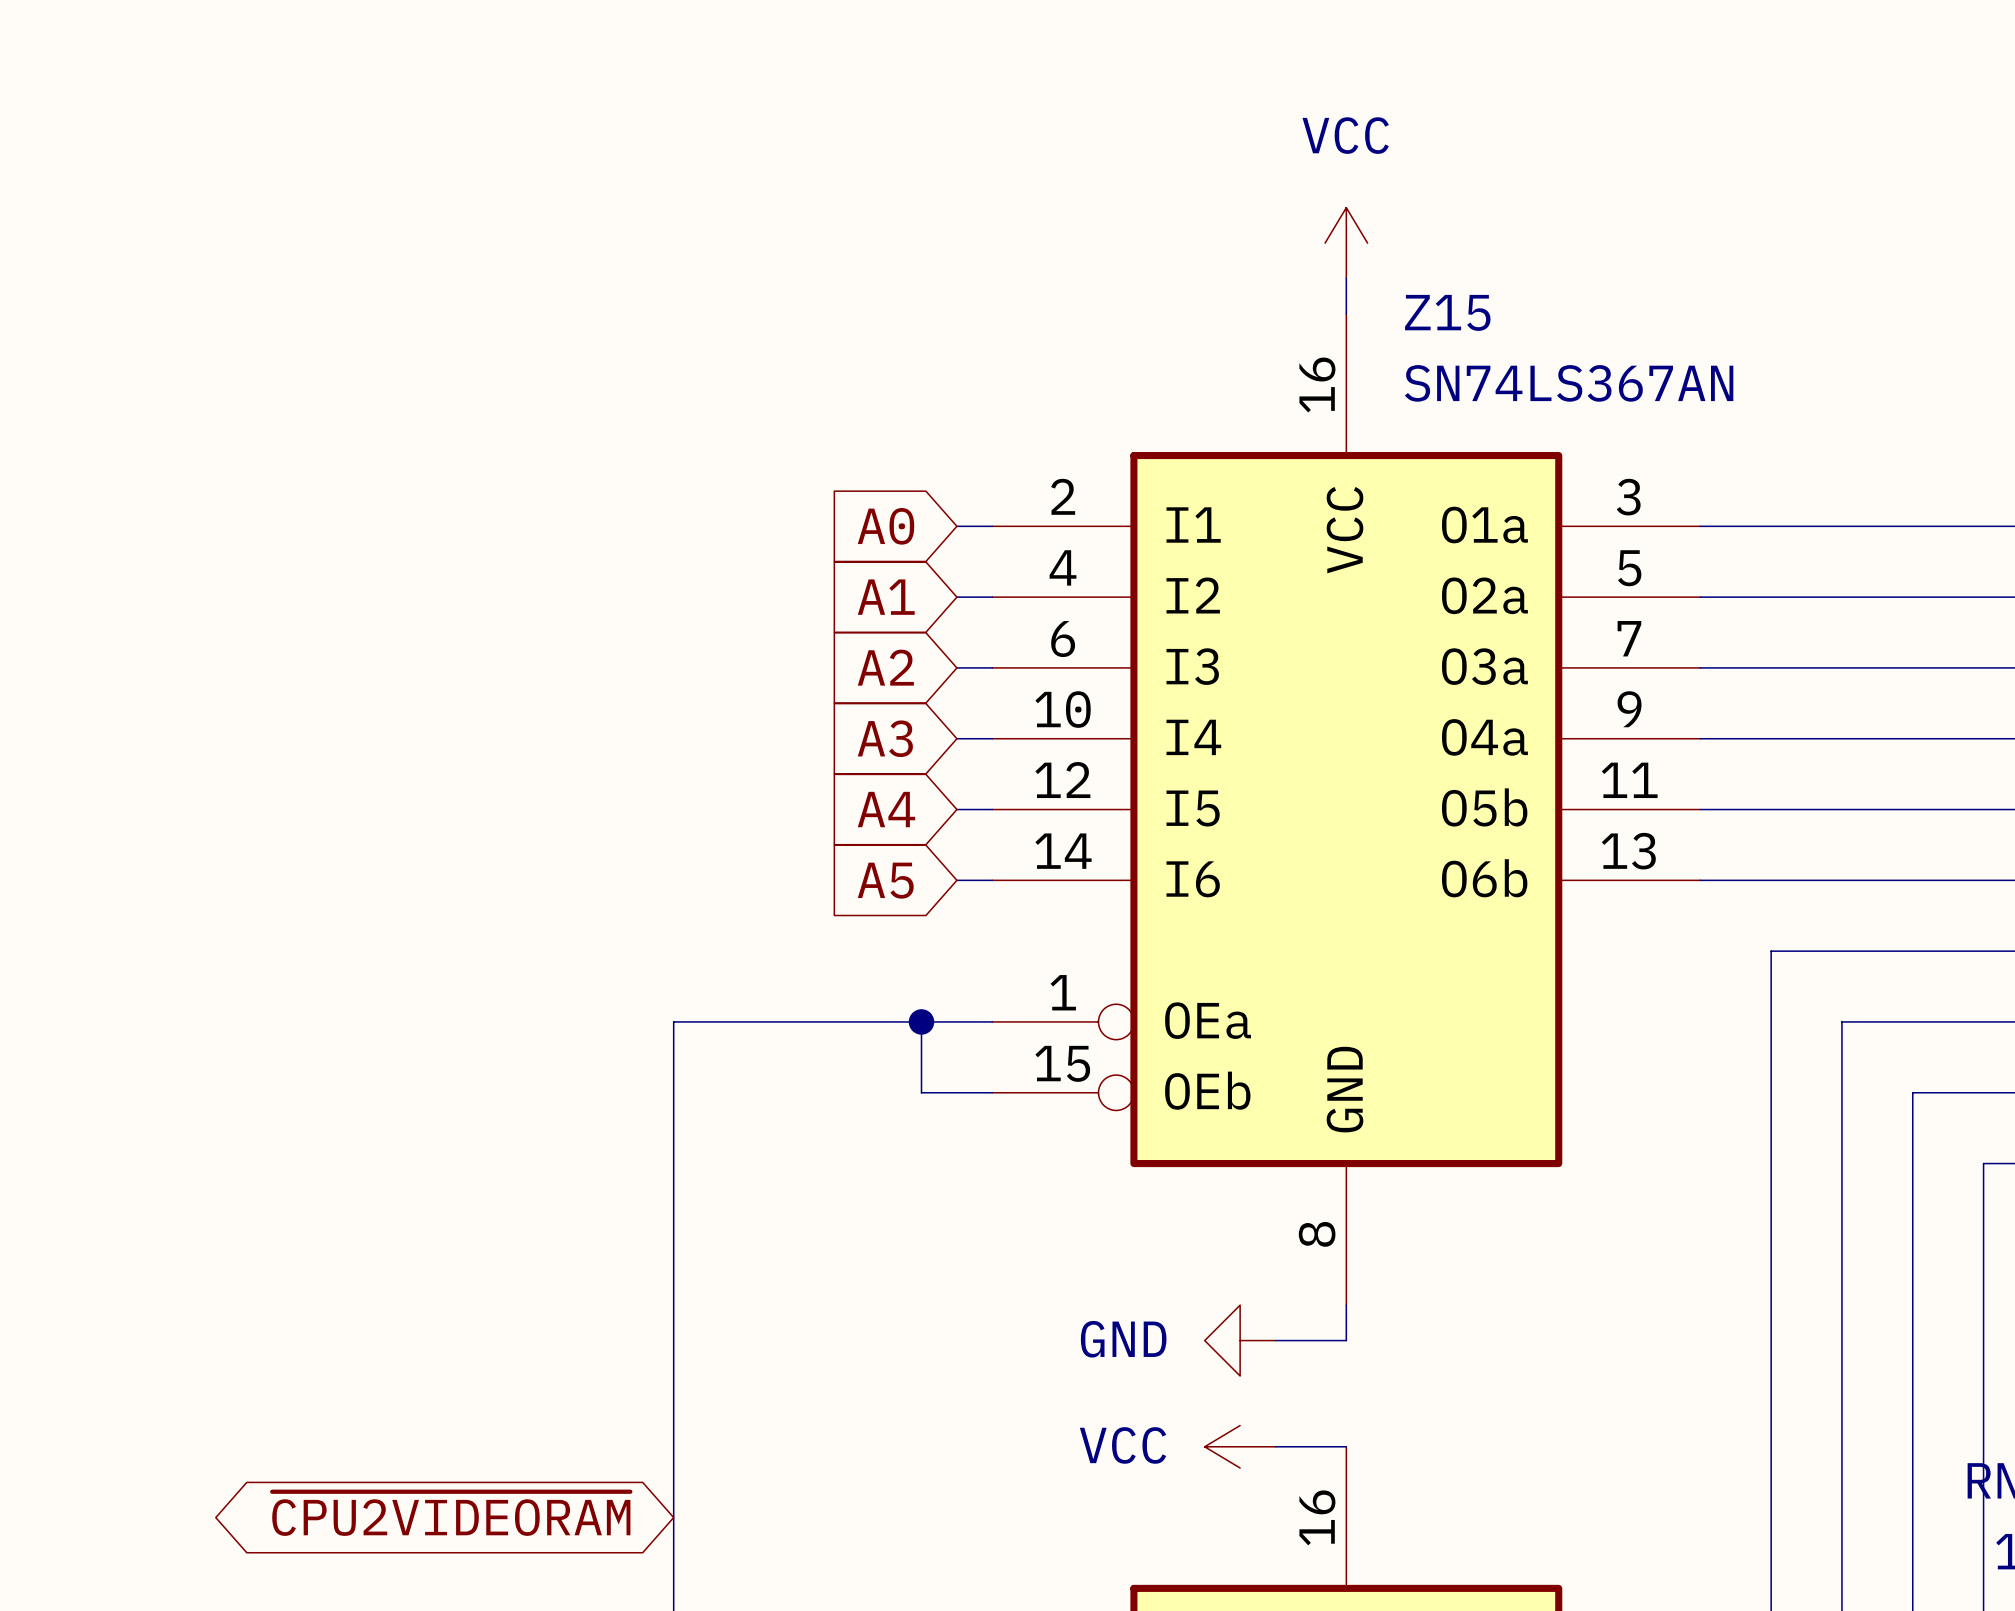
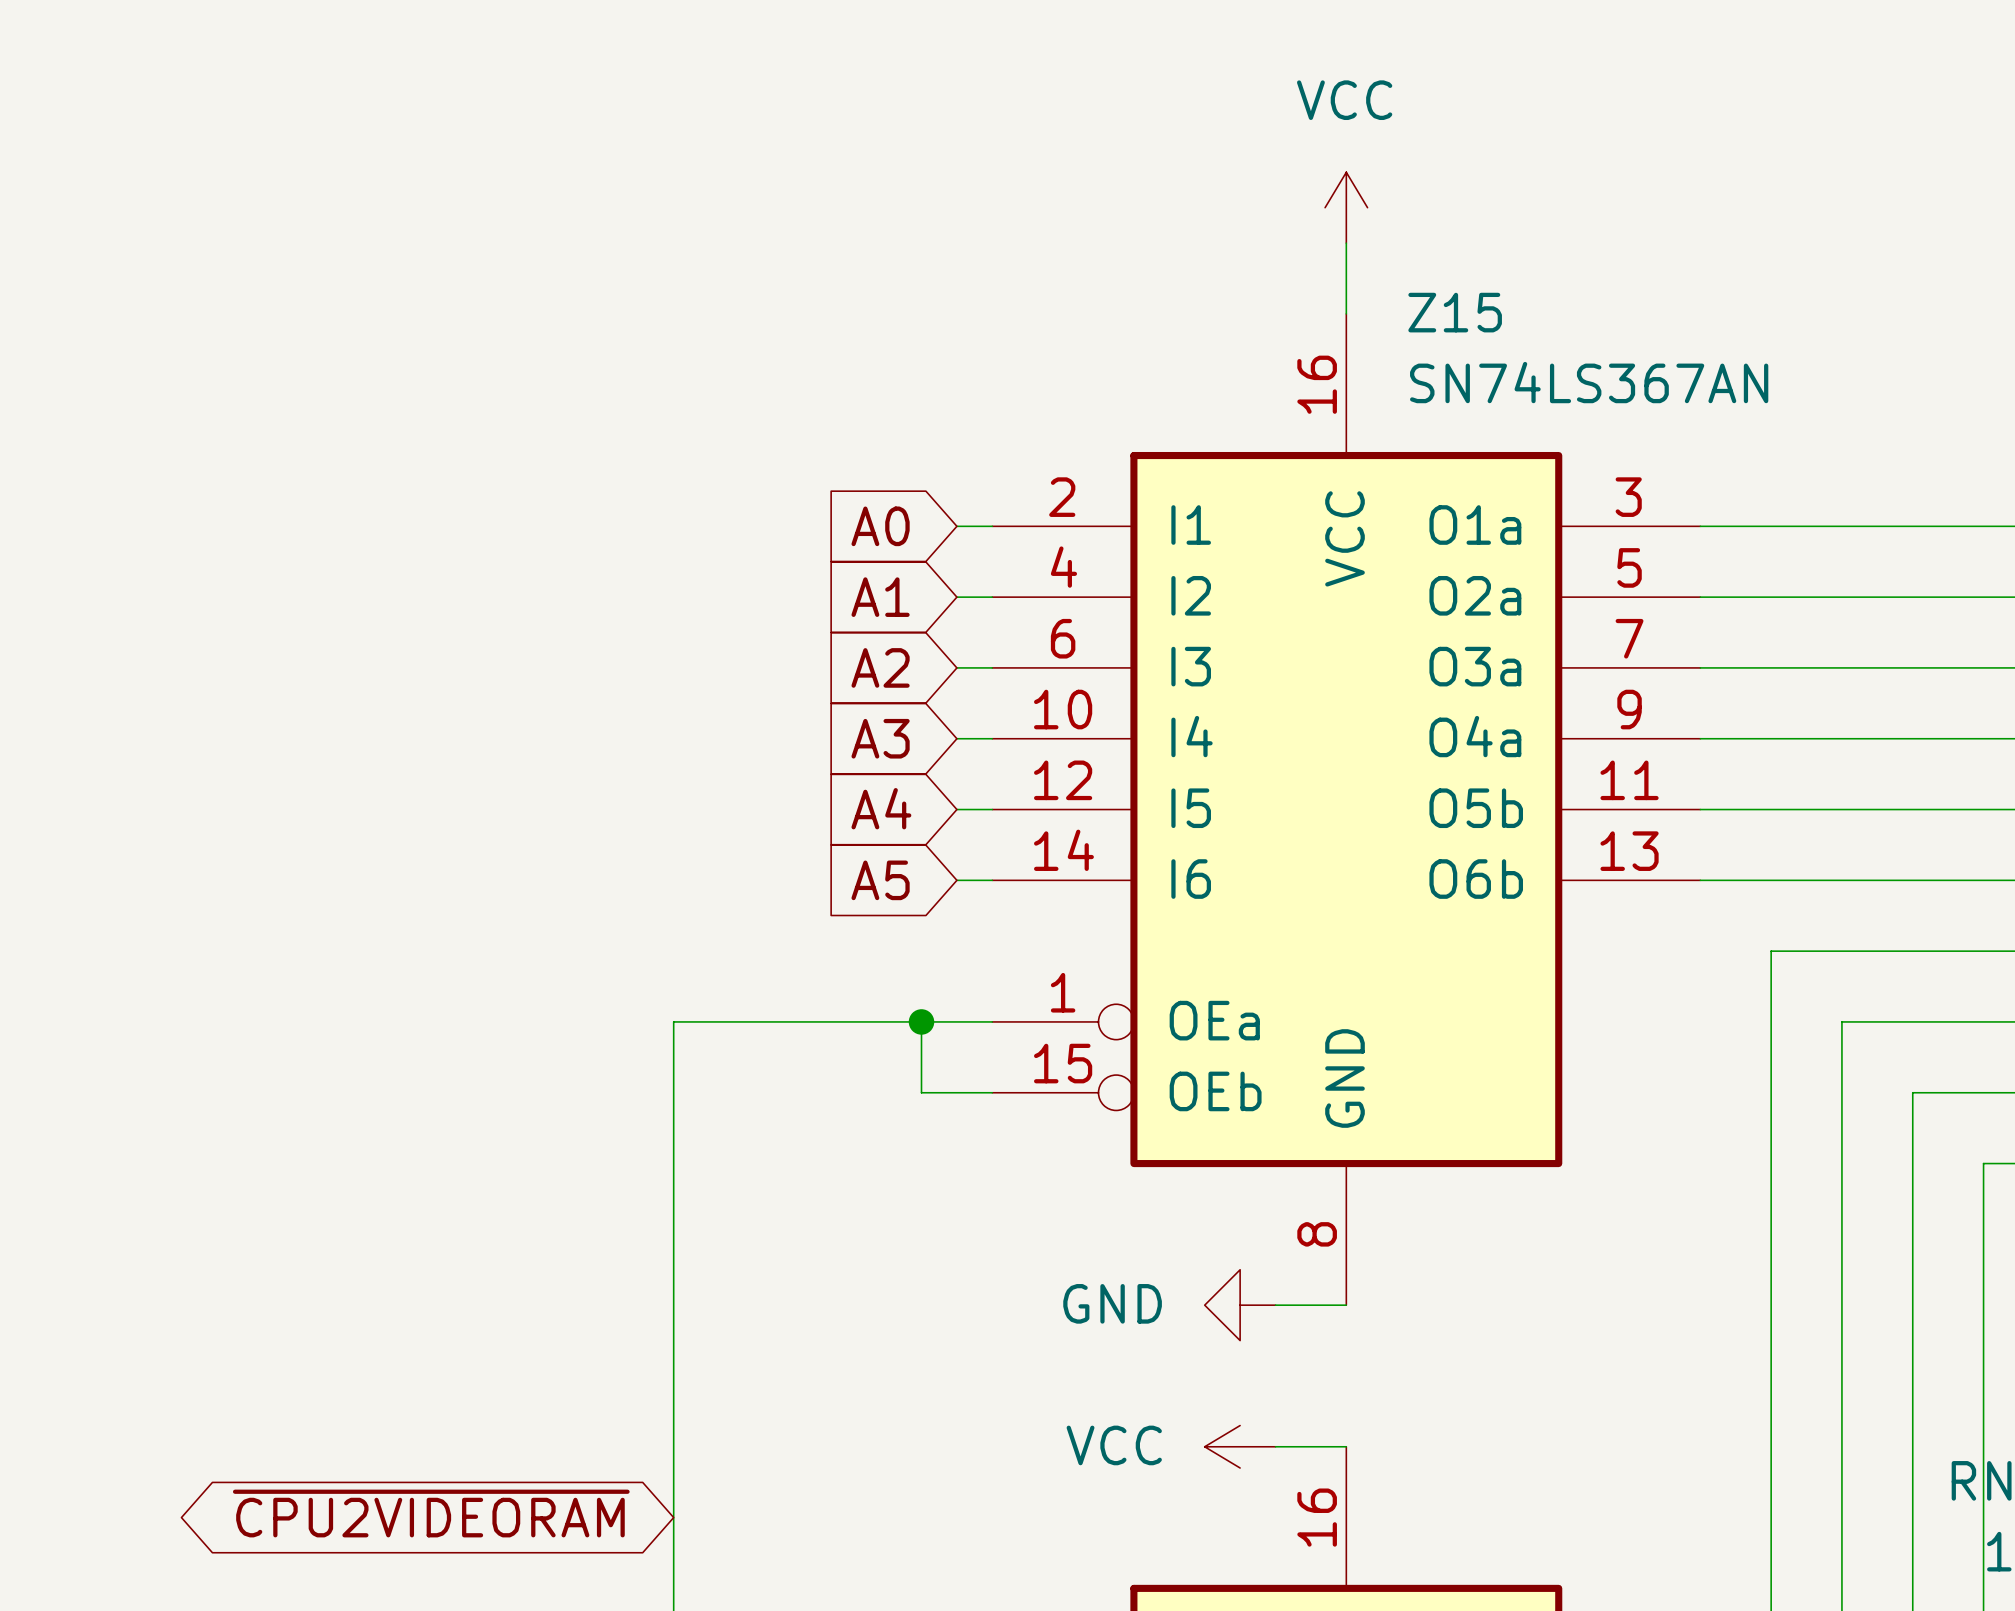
power symbol position: VCC (1346, 243) -> VCC (1346, 207)
wire: (1346, 1305) (1346, 1340) (1275, 1340) -> (1346, 1305) (1275, 1305)
power symbol position: GND (1240, 1340) -> GND (1240, 1305)

